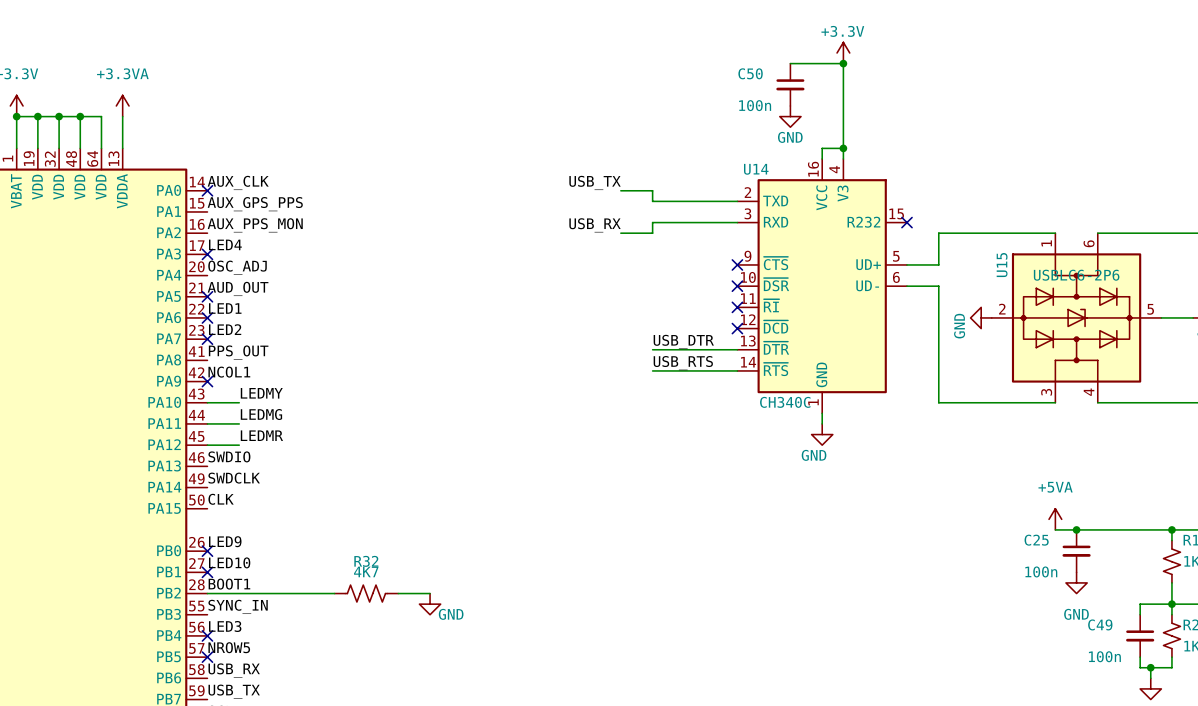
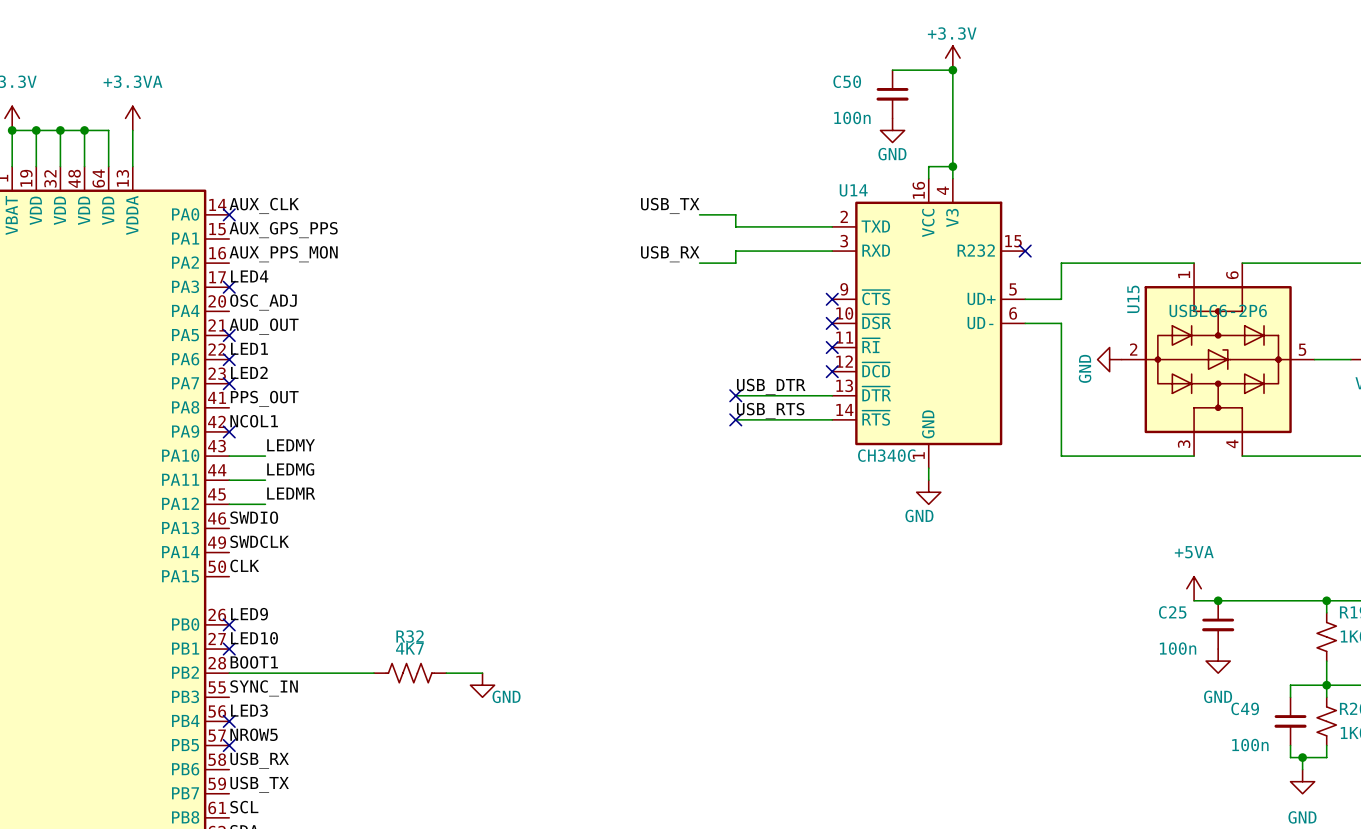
no-connect mark: none -> (735, 395)
no-connect mark: none -> (735, 419)

